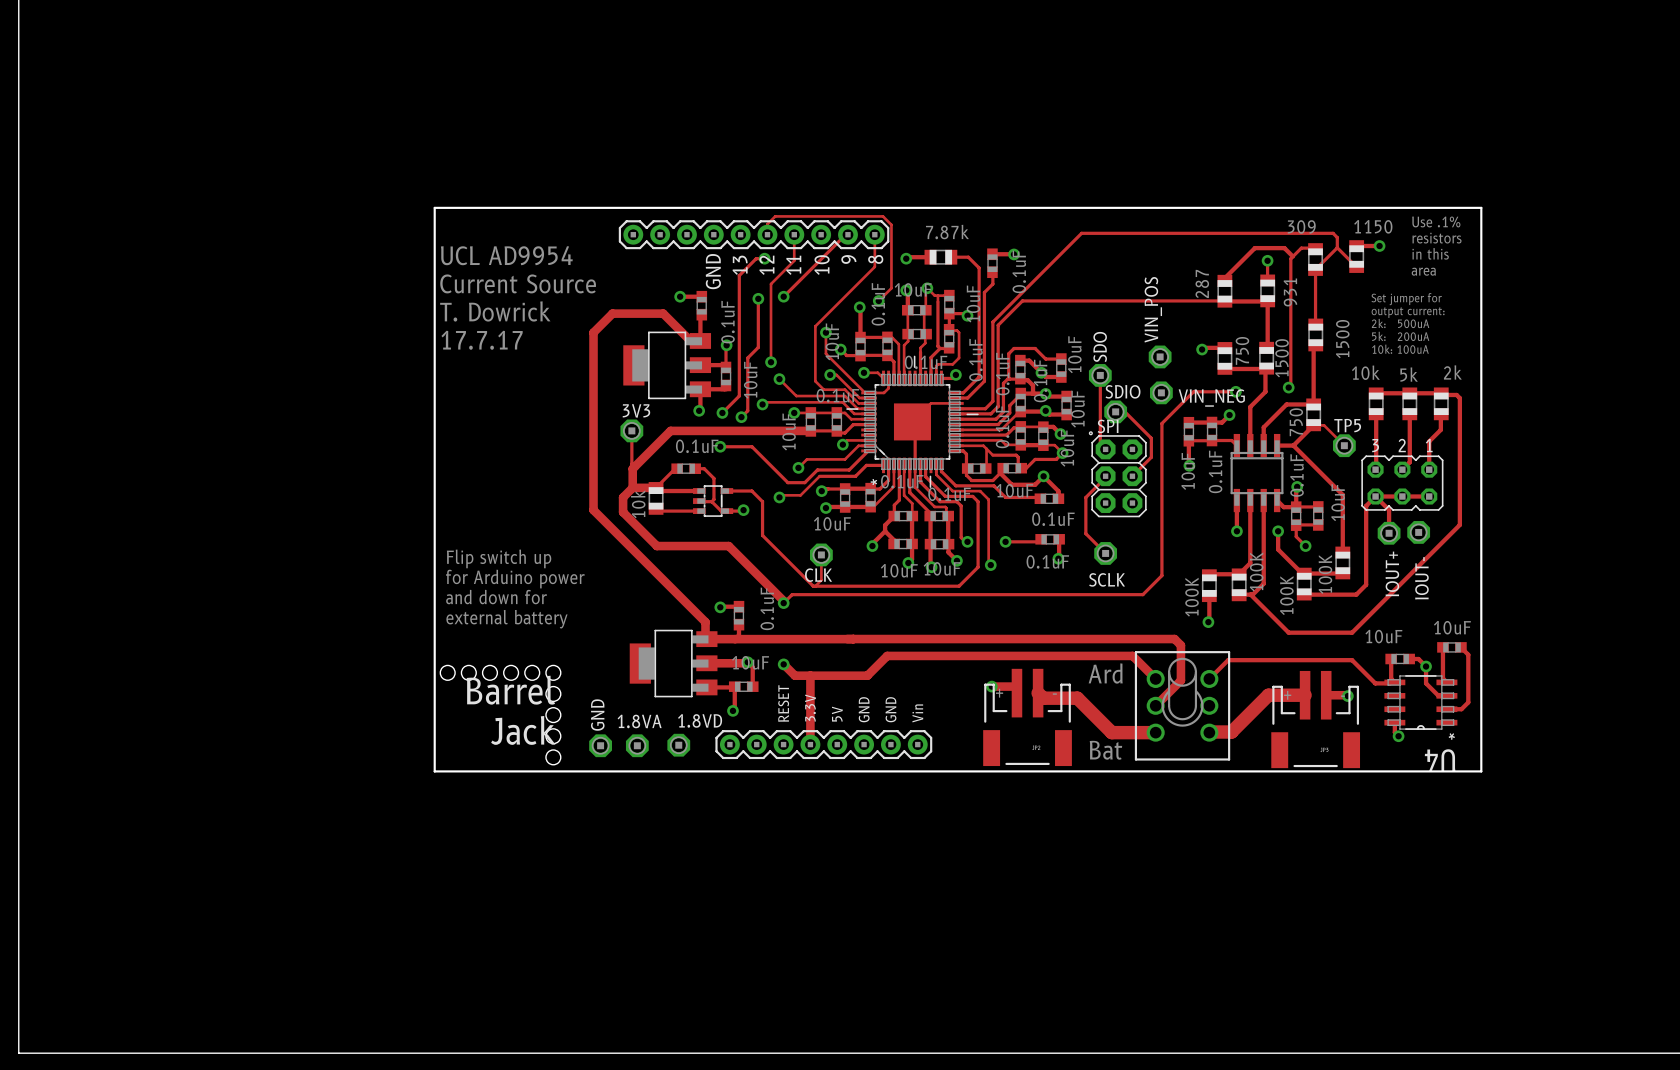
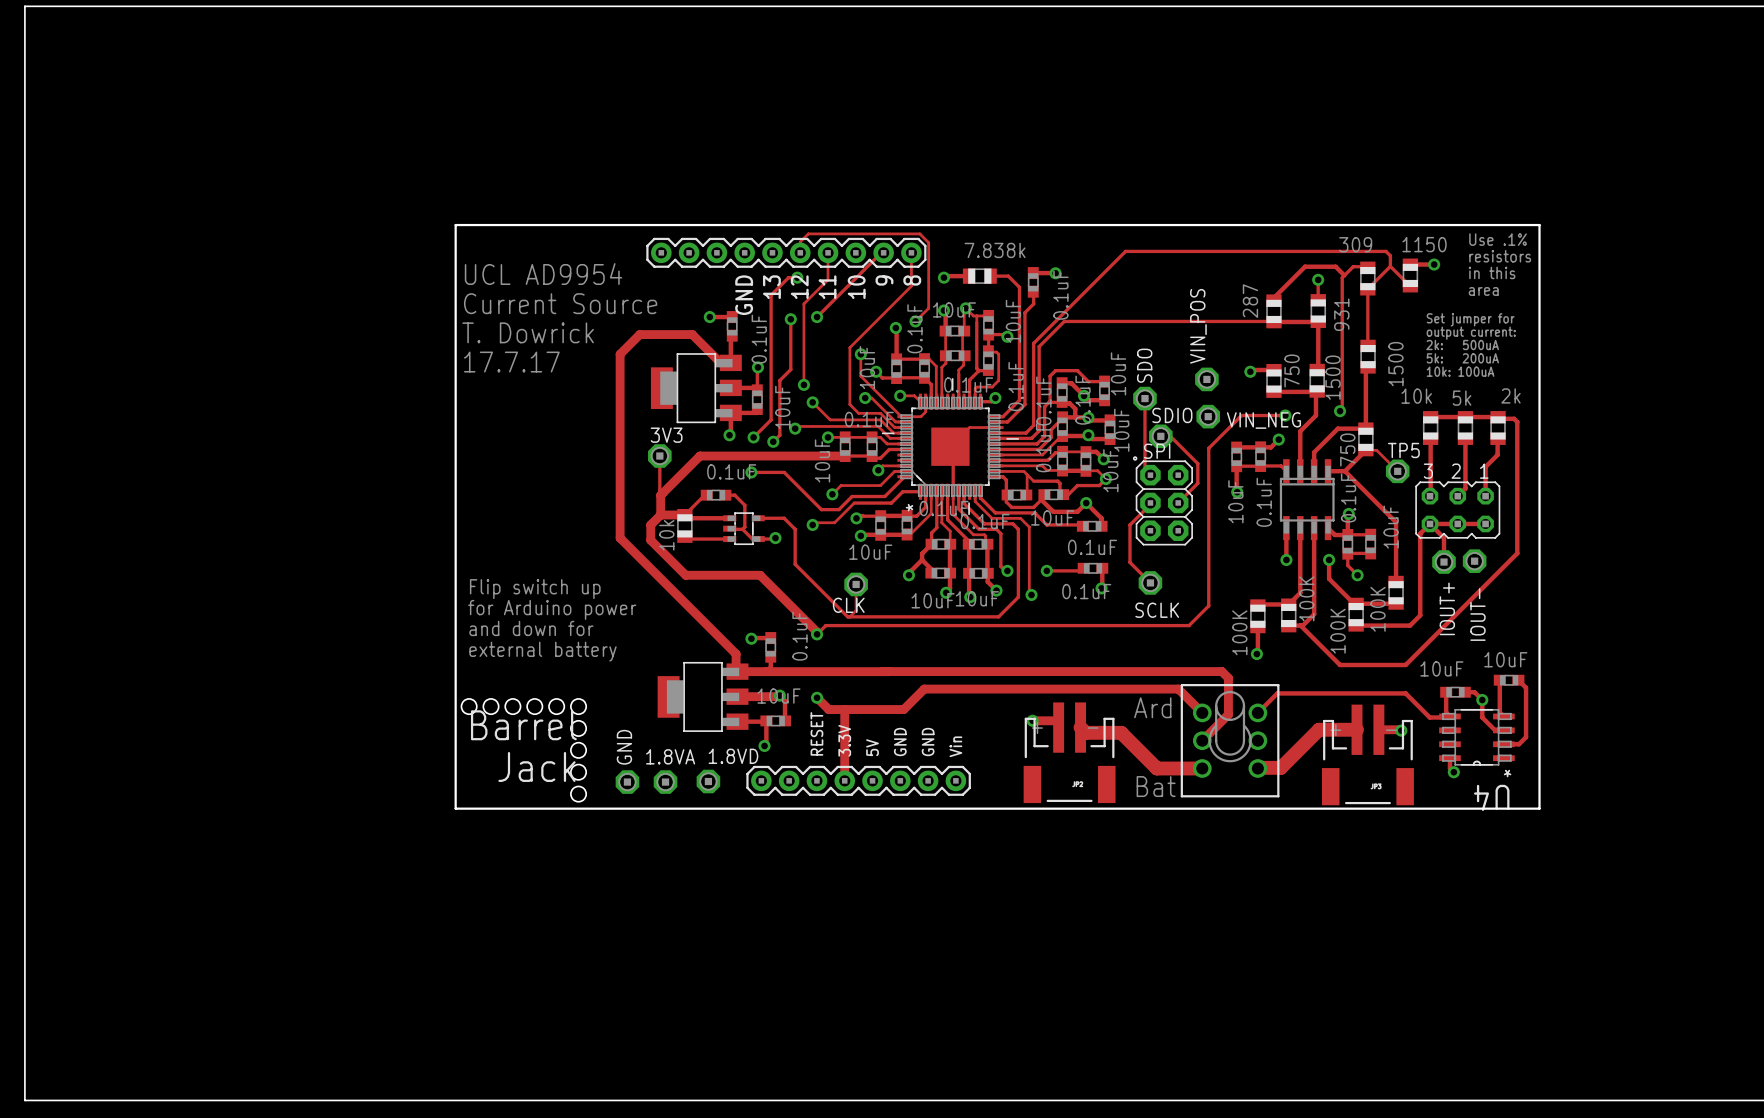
part value: 7.87k (947, 232) -> 7.838k (995, 250)

